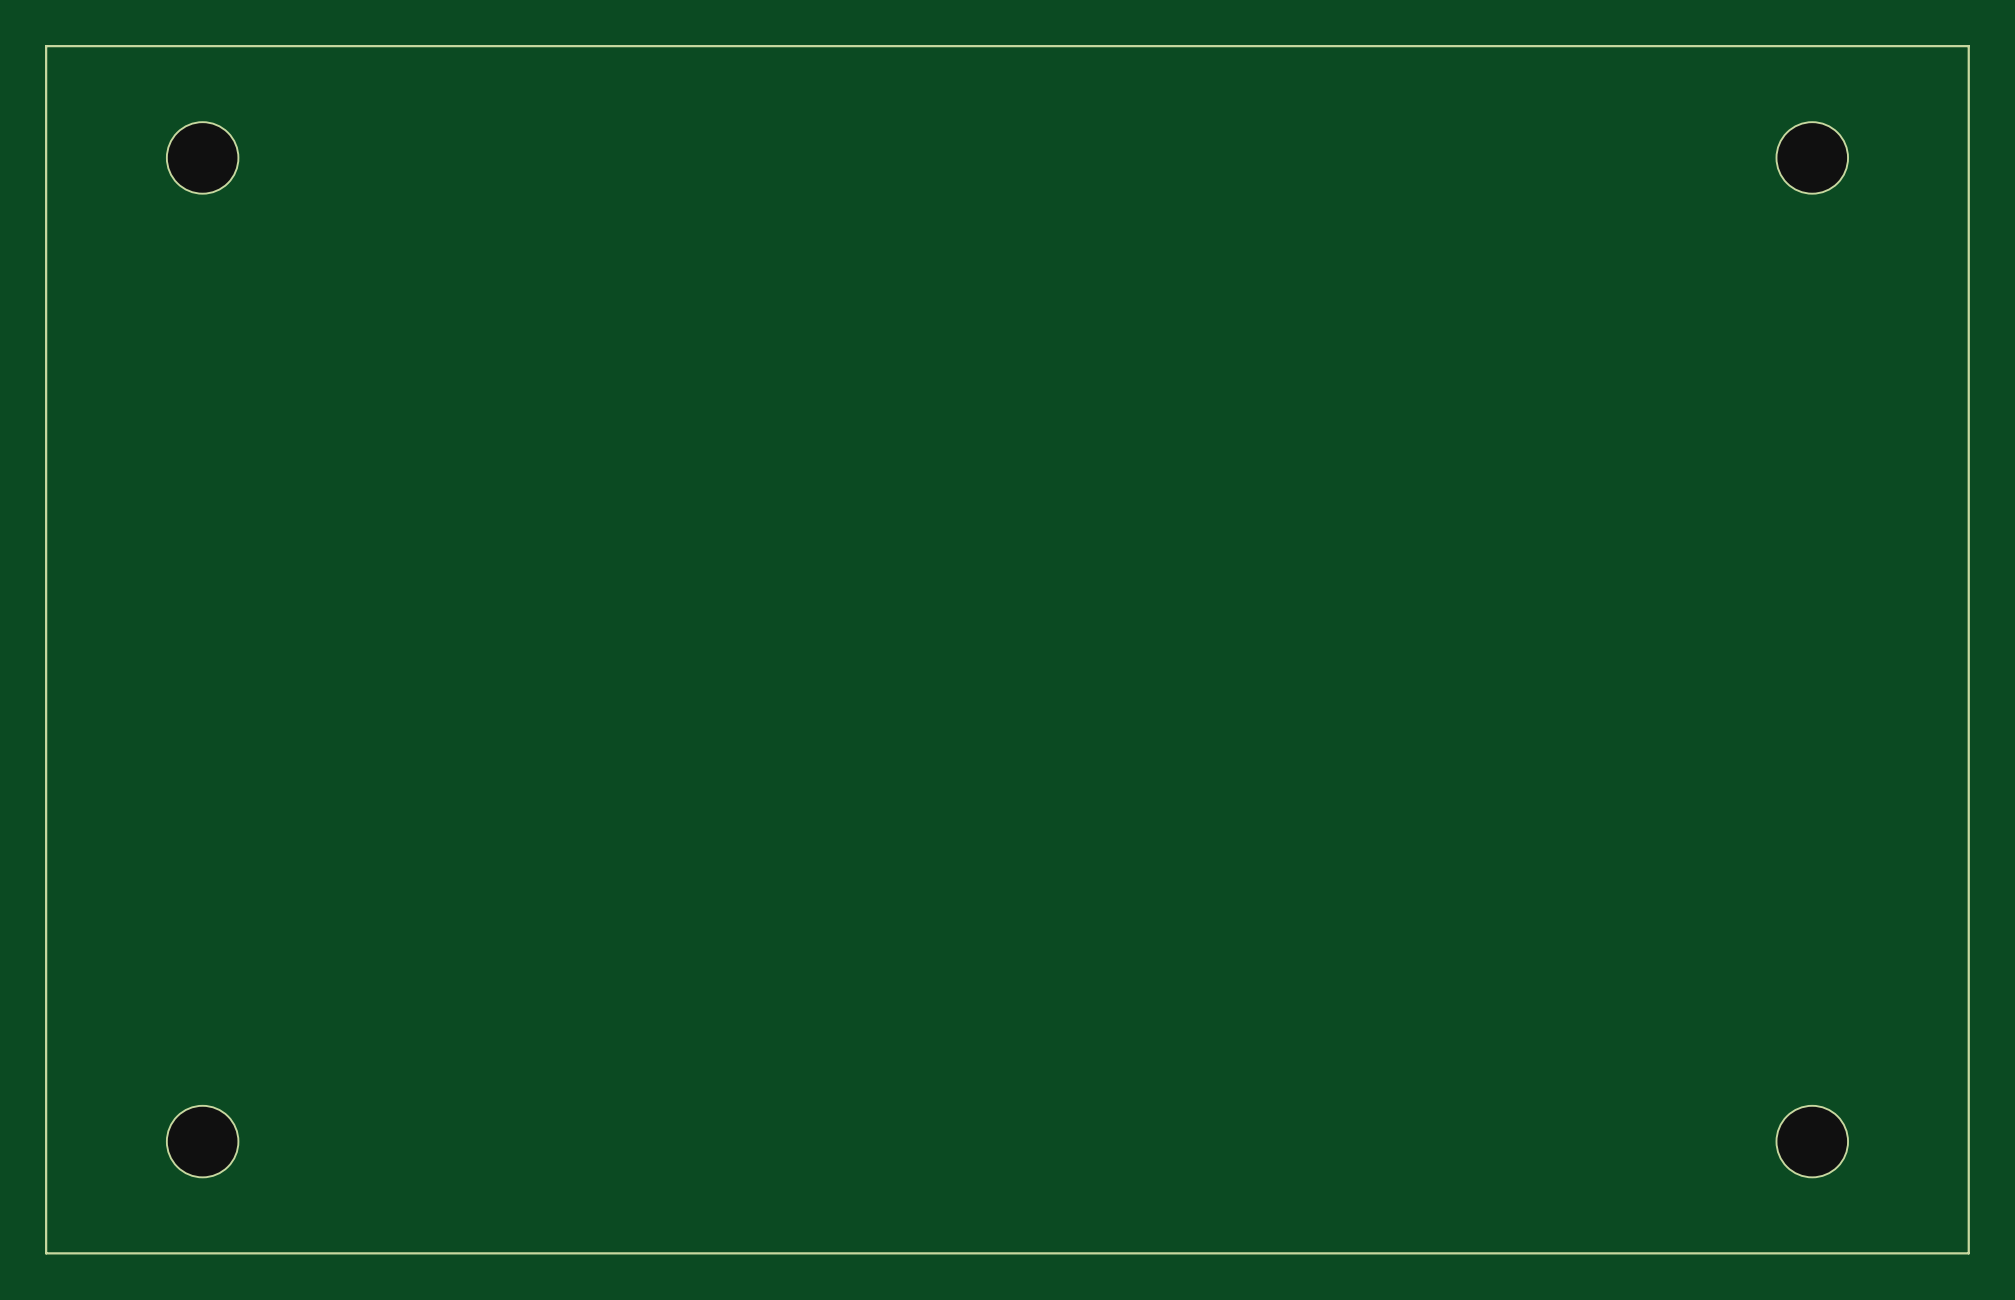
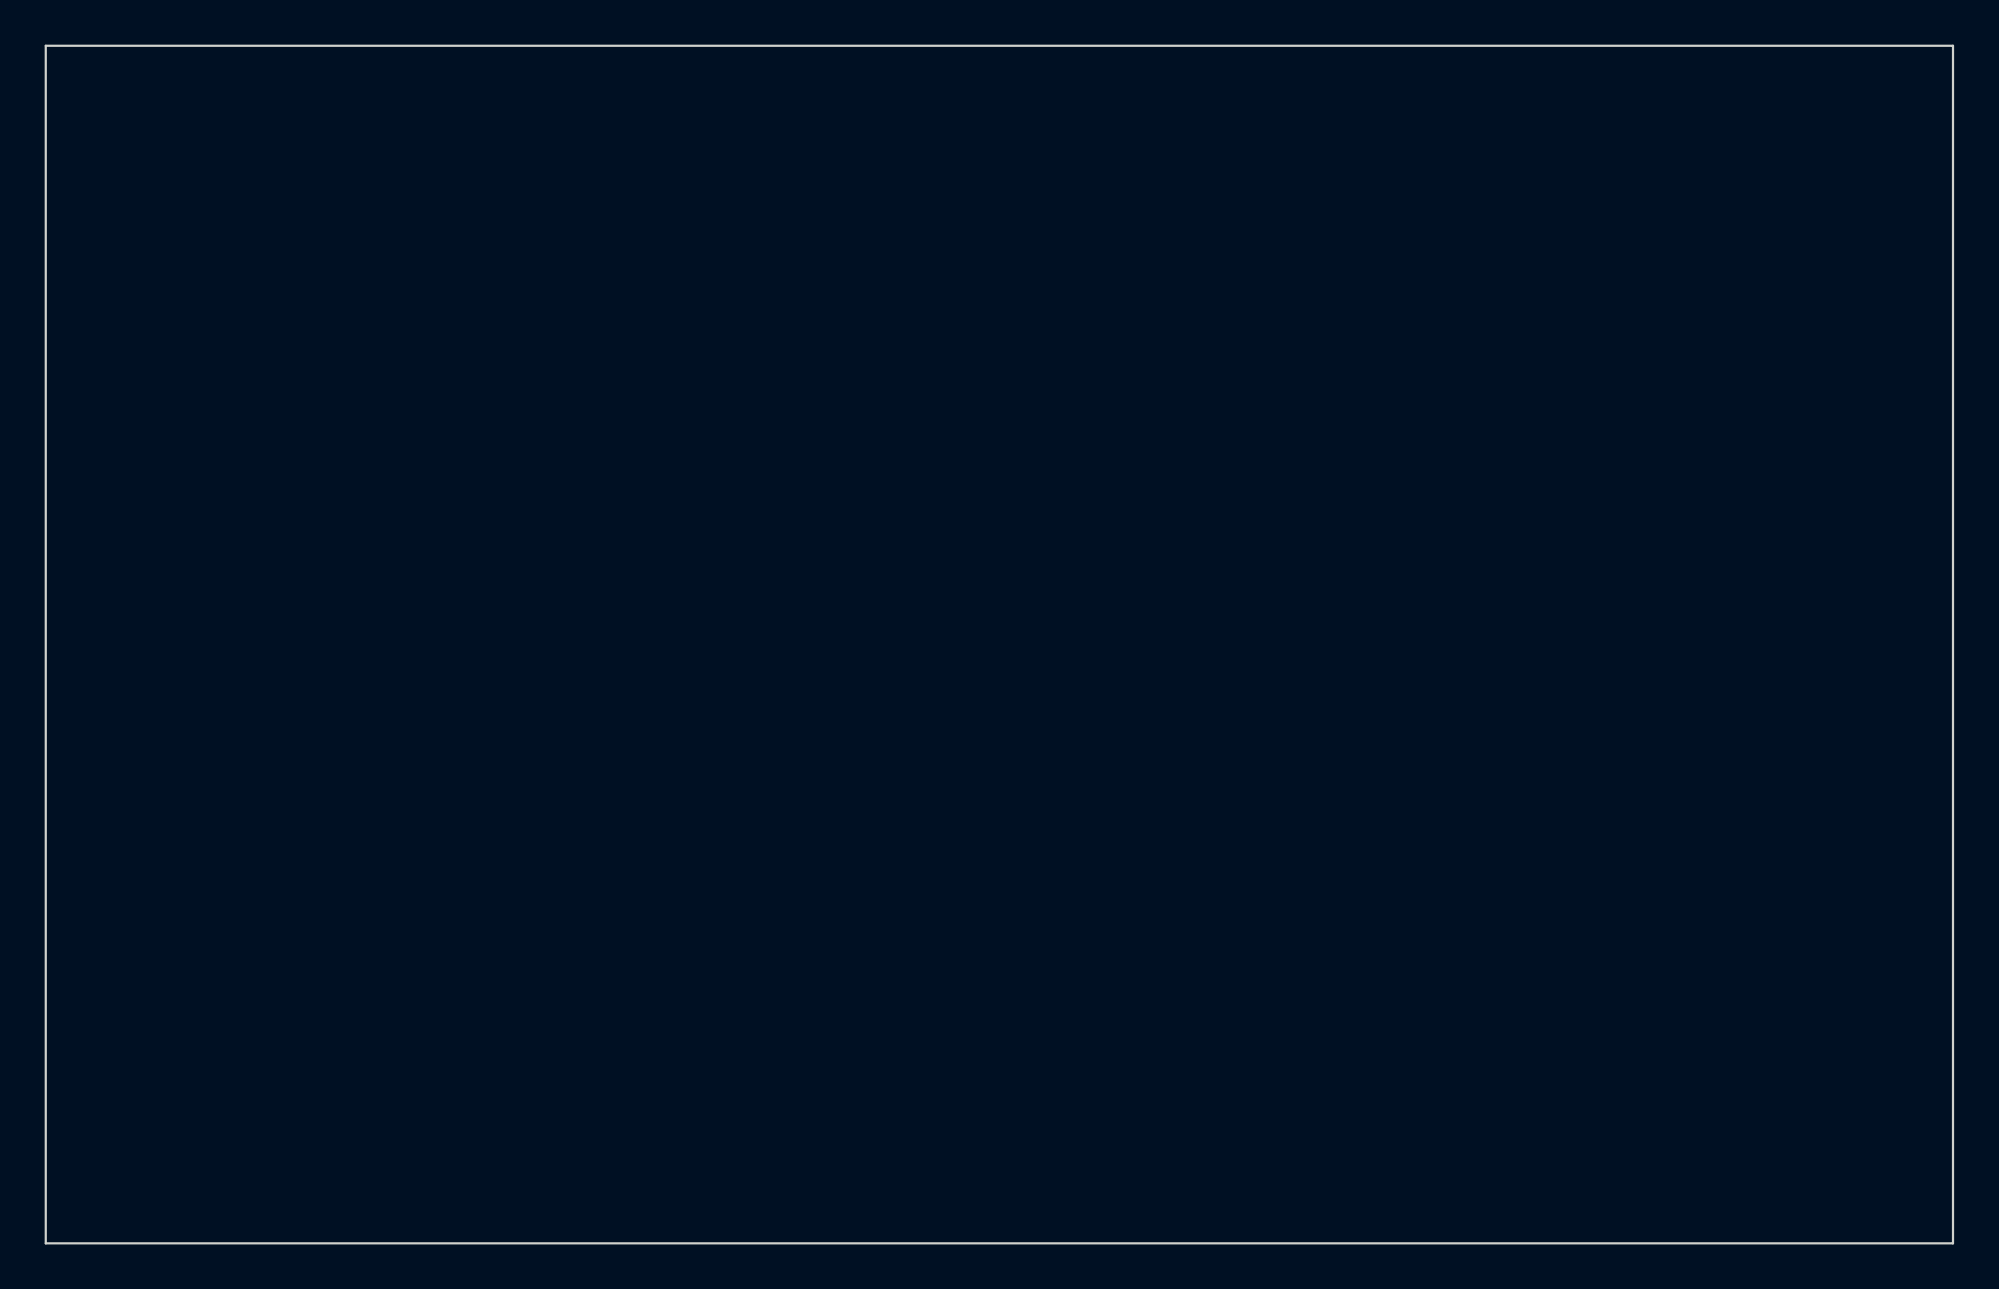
part: (202, 157) -> none
part: (1812, 157) -> none
part: (202, 1141) -> none
part: (1812, 1141) -> none

